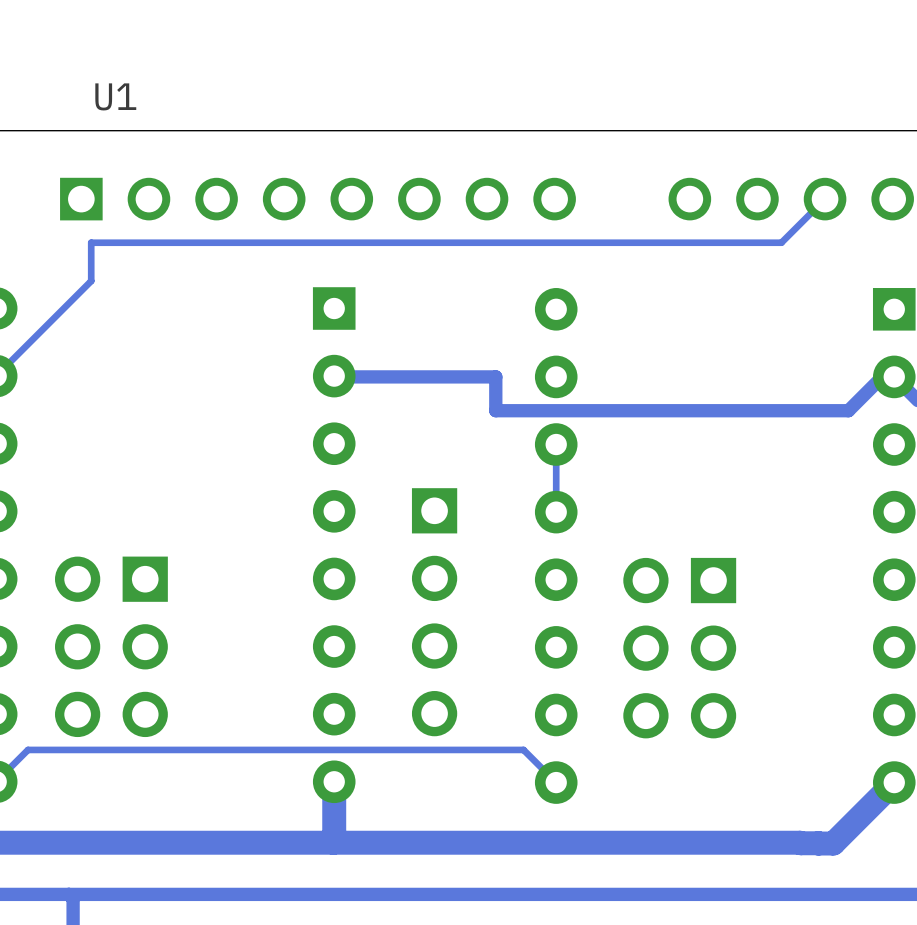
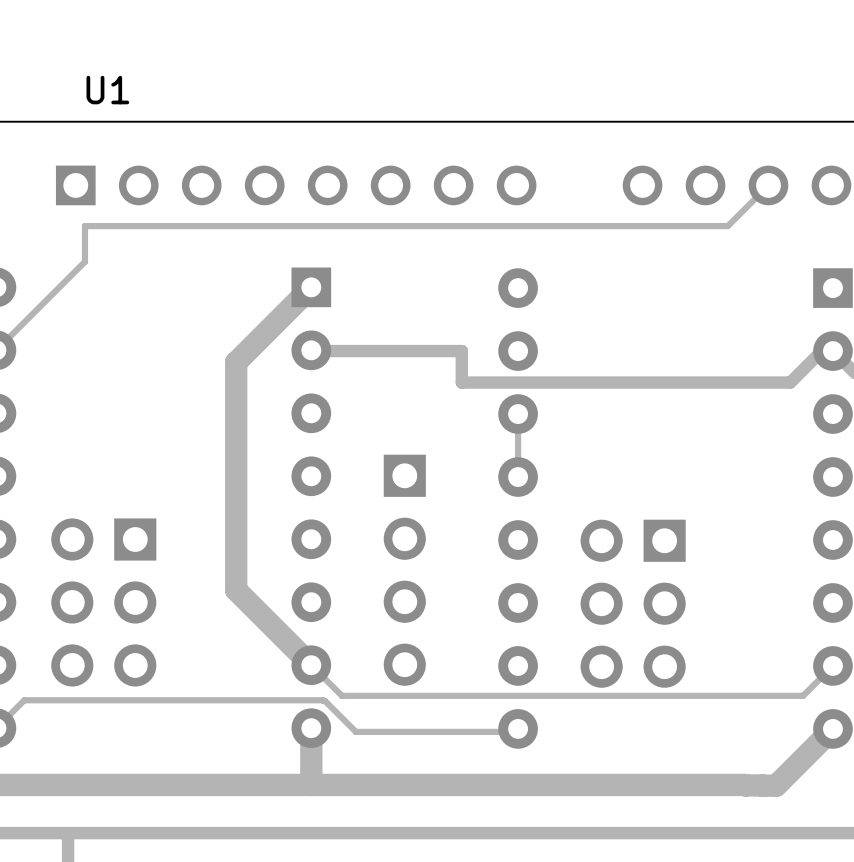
track: none -> (311, 287) (236, 362) (236, 590) (341, 695) (803, 695) (832, 665)
track: (26, 751) (28, 749) (523, 749) (556, 782) -> (24, 700) (322, 700) (355, 731) (515, 731) (518, 728)

